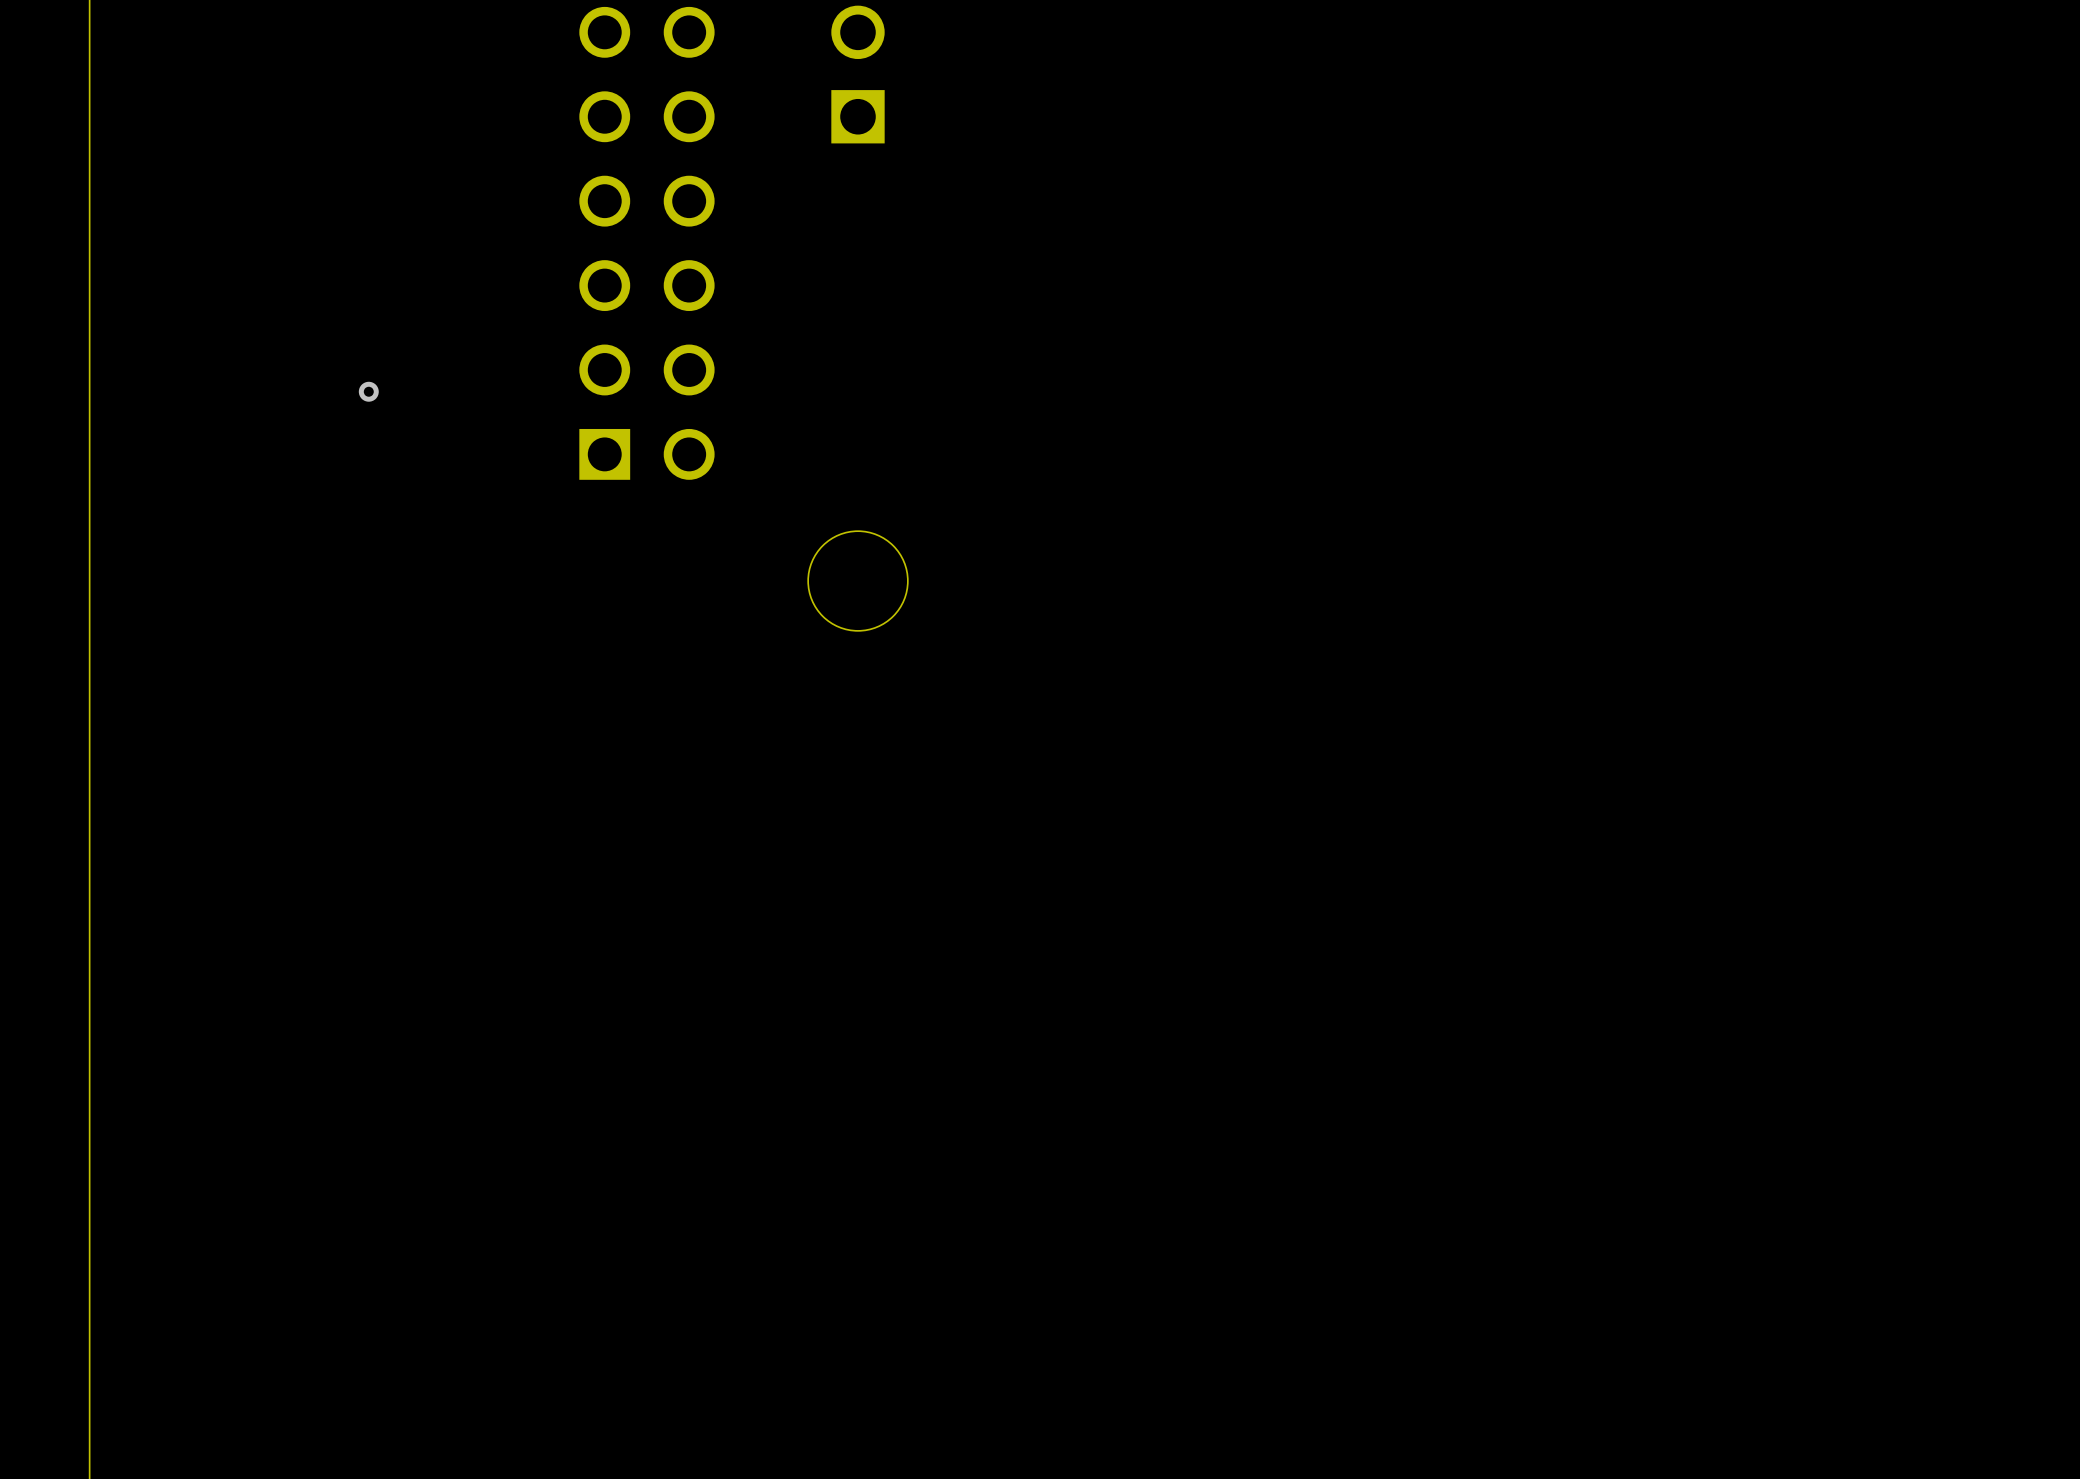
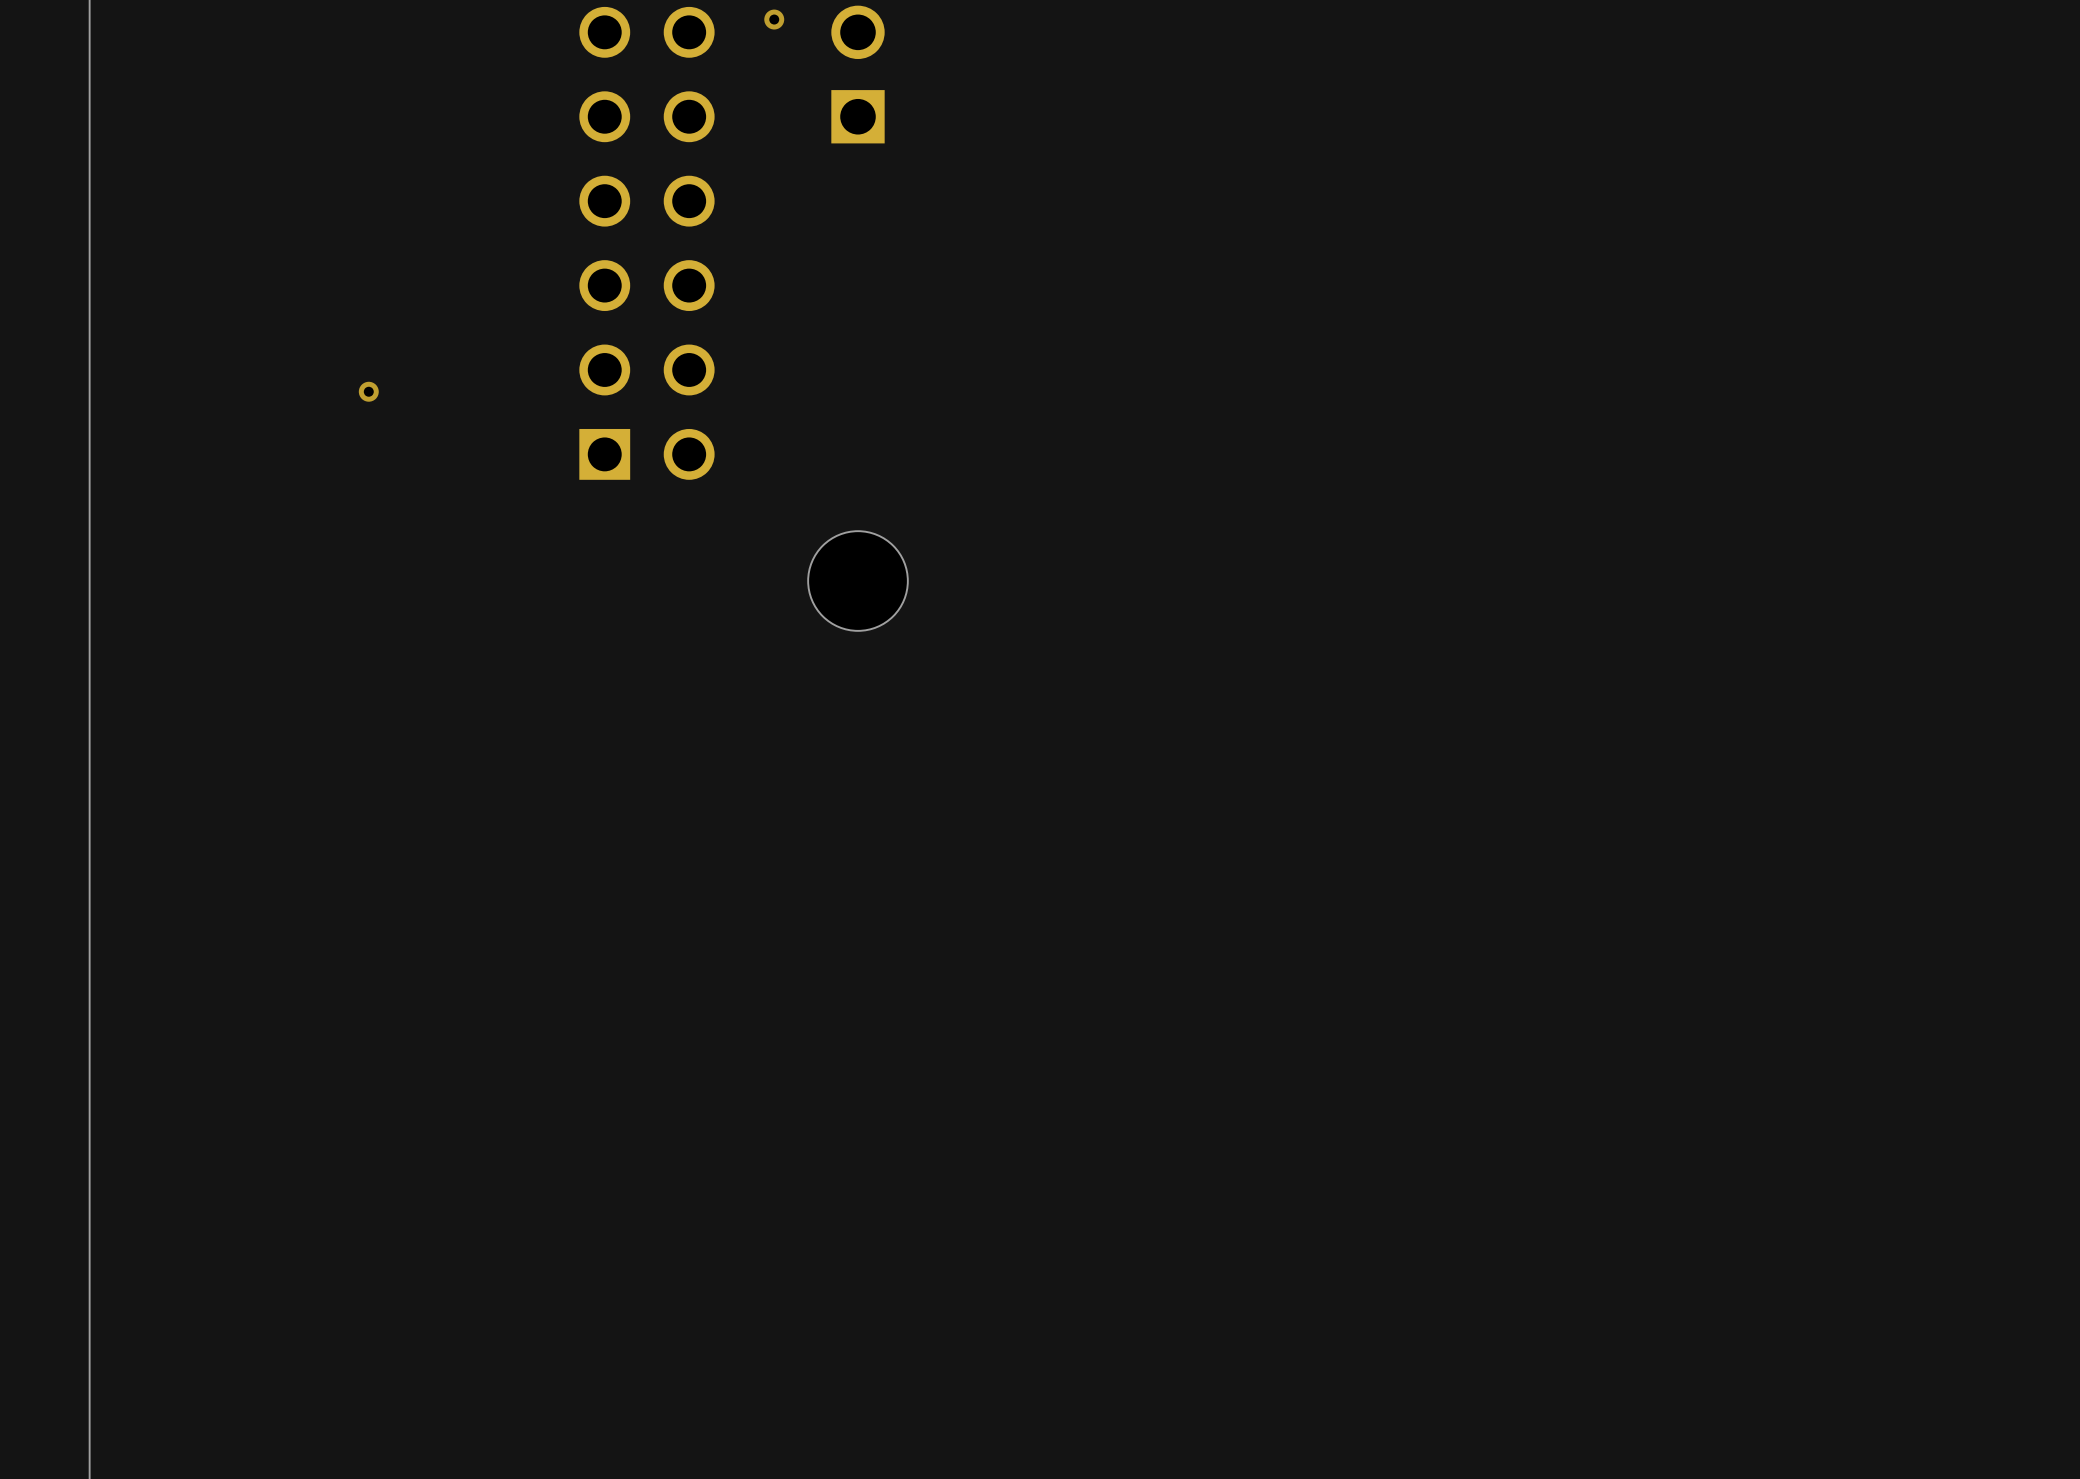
via: none -> (774, 19)

